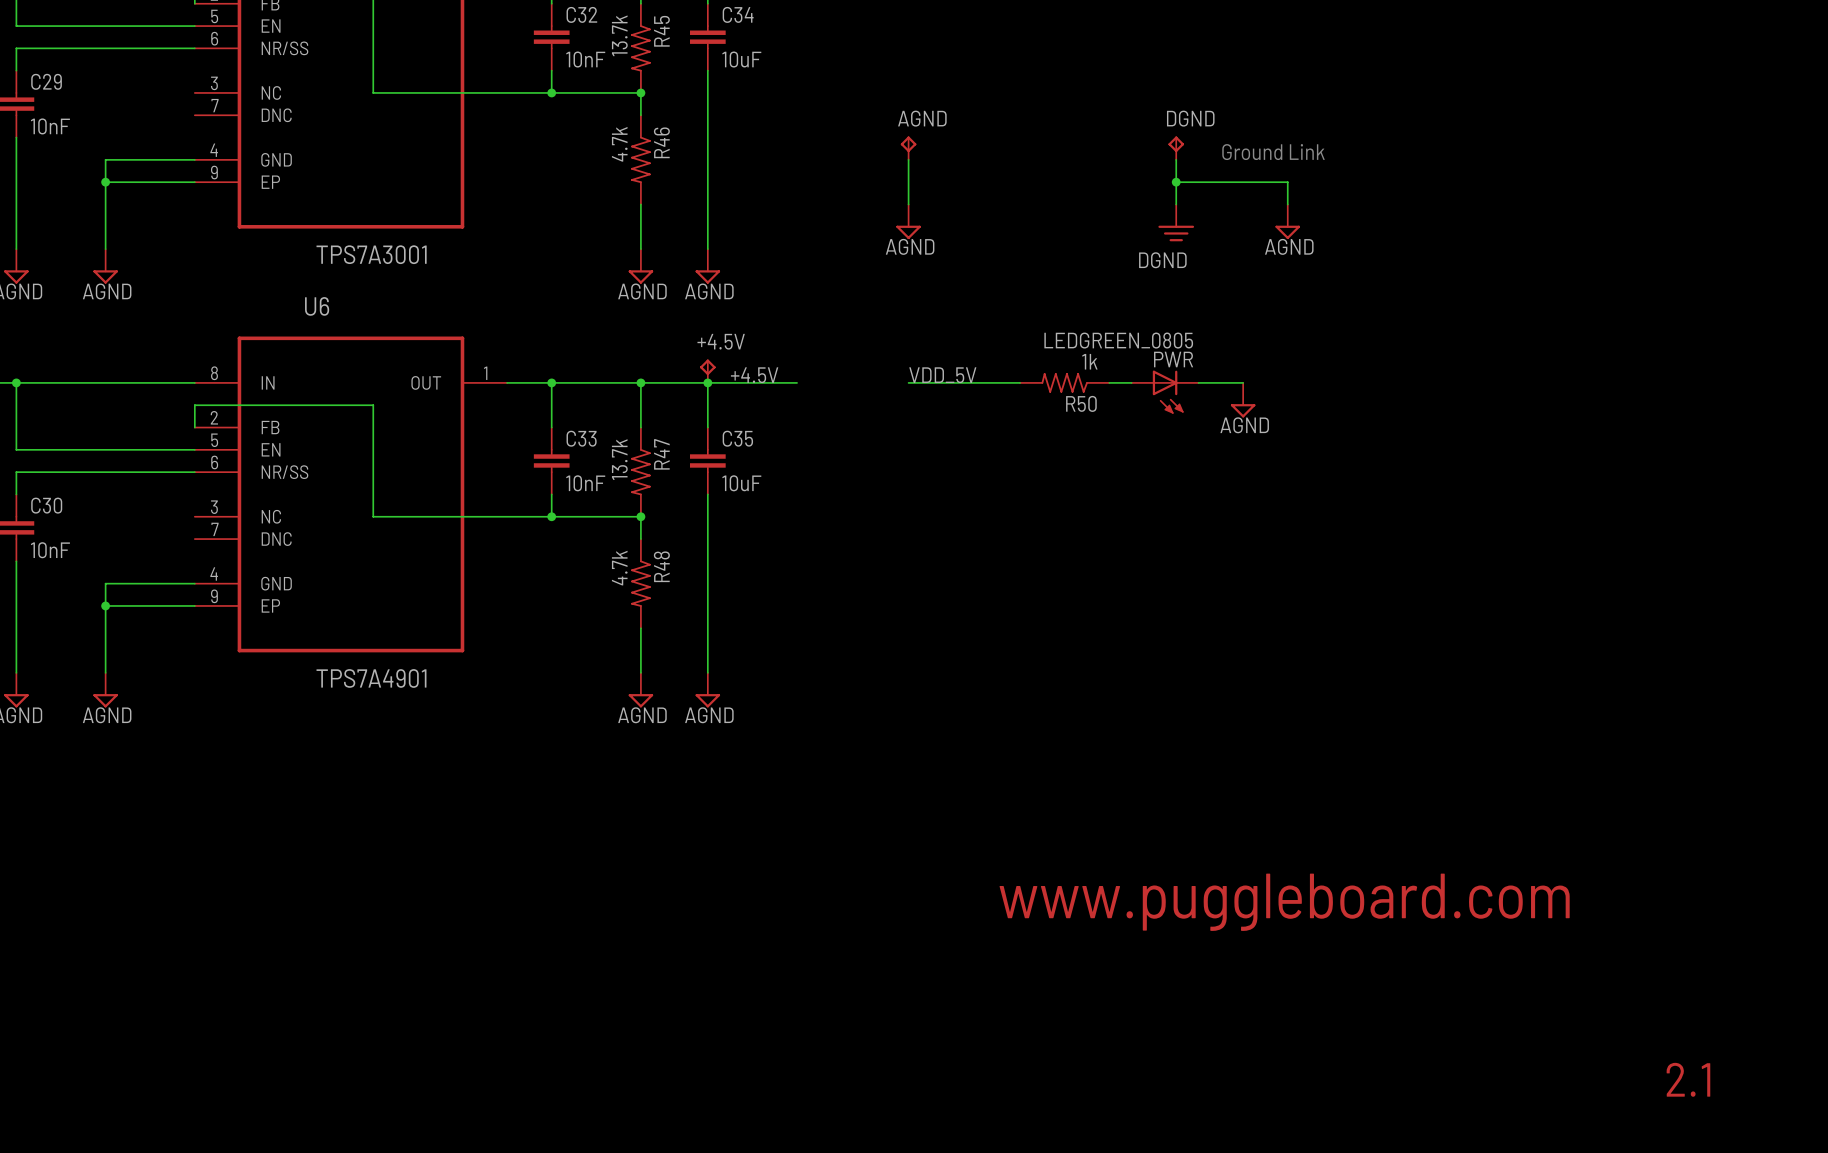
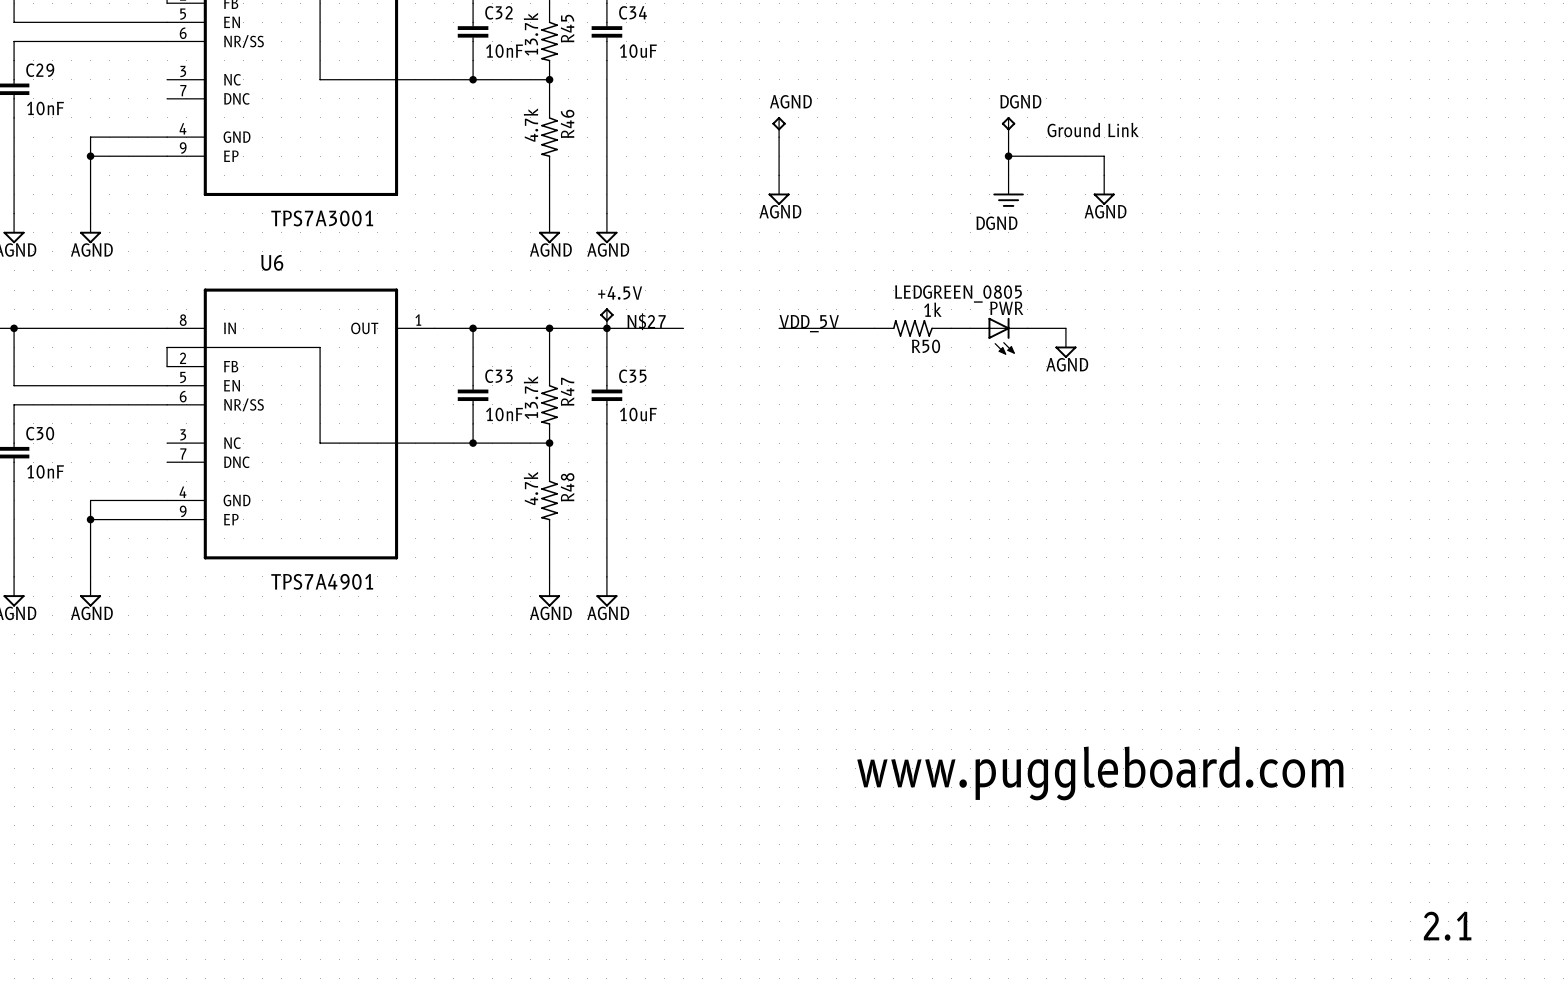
label: +4.5V (754, 375) -> N$27 (646, 321)

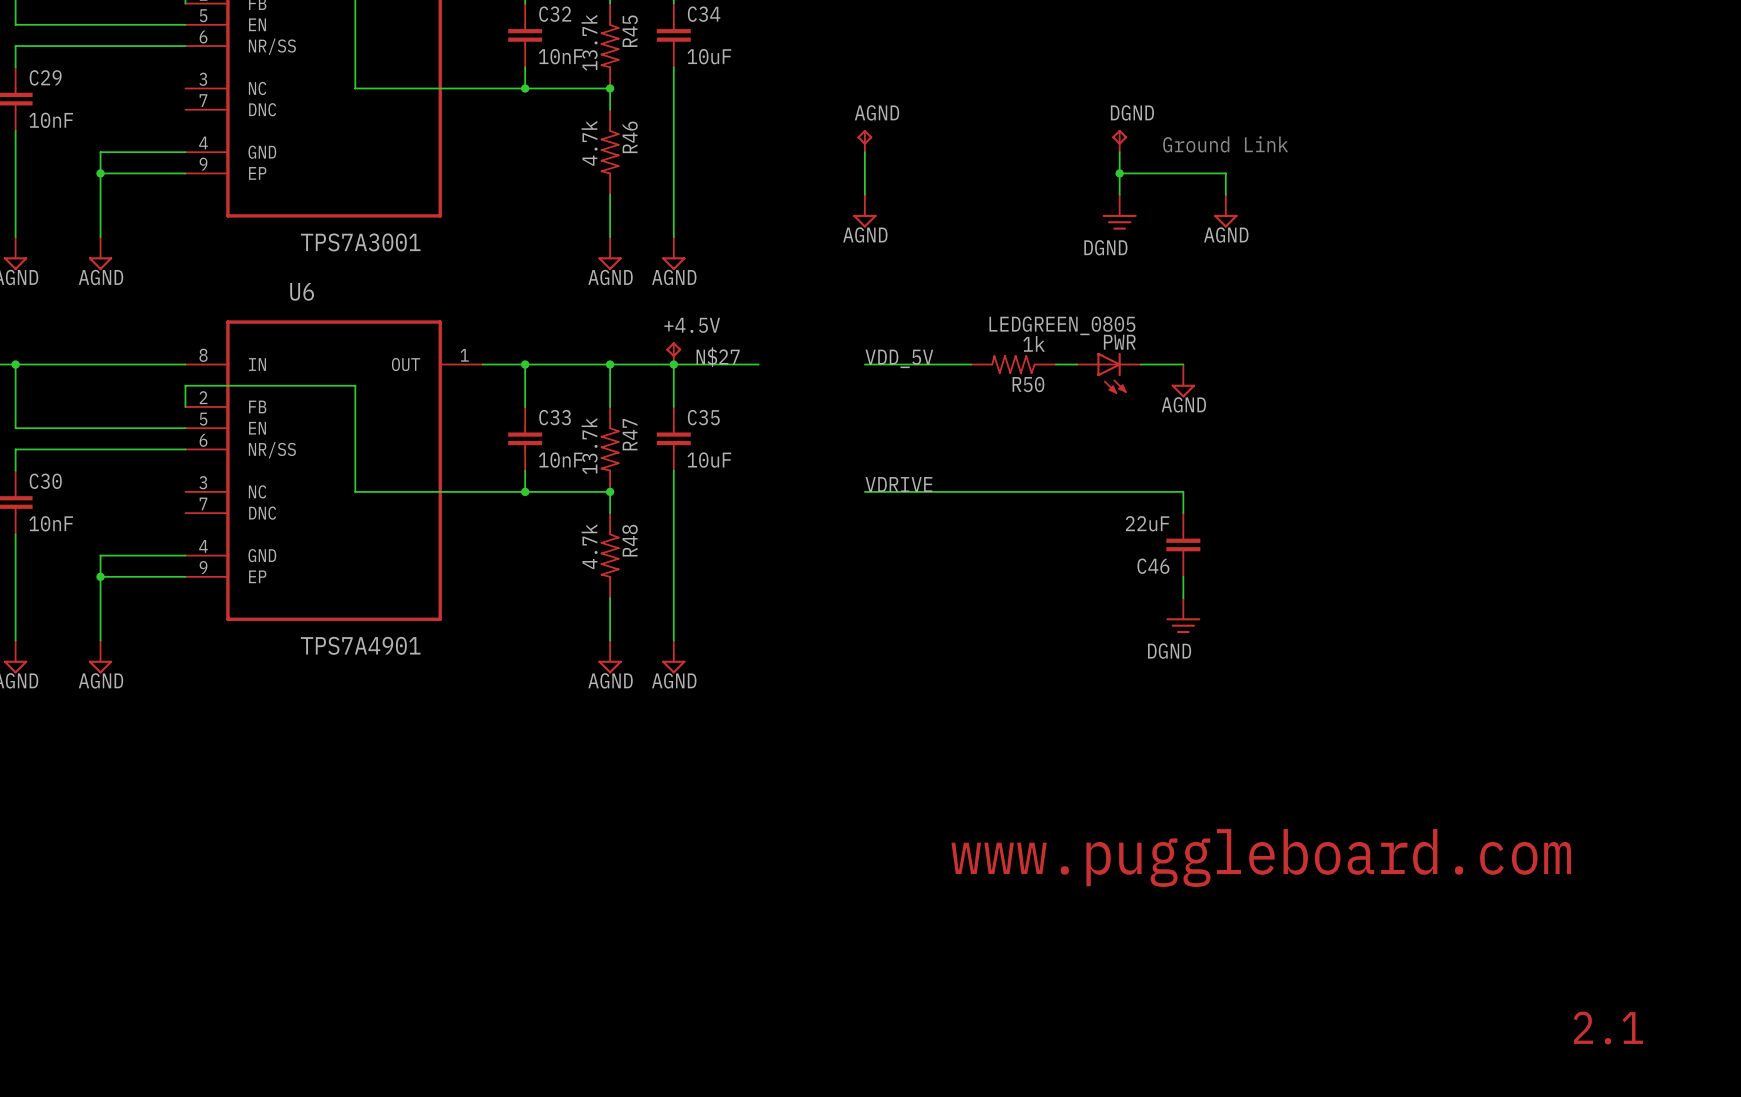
label: none -> VDRIVE (898, 484)
wire: none -> (864, 491) (1183, 491) (1183, 513)
C46: none -> 22uF (1183, 544)
wire: none -> (1183, 576) (1183, 598)
power symbol: none -> DGND (1183, 615)

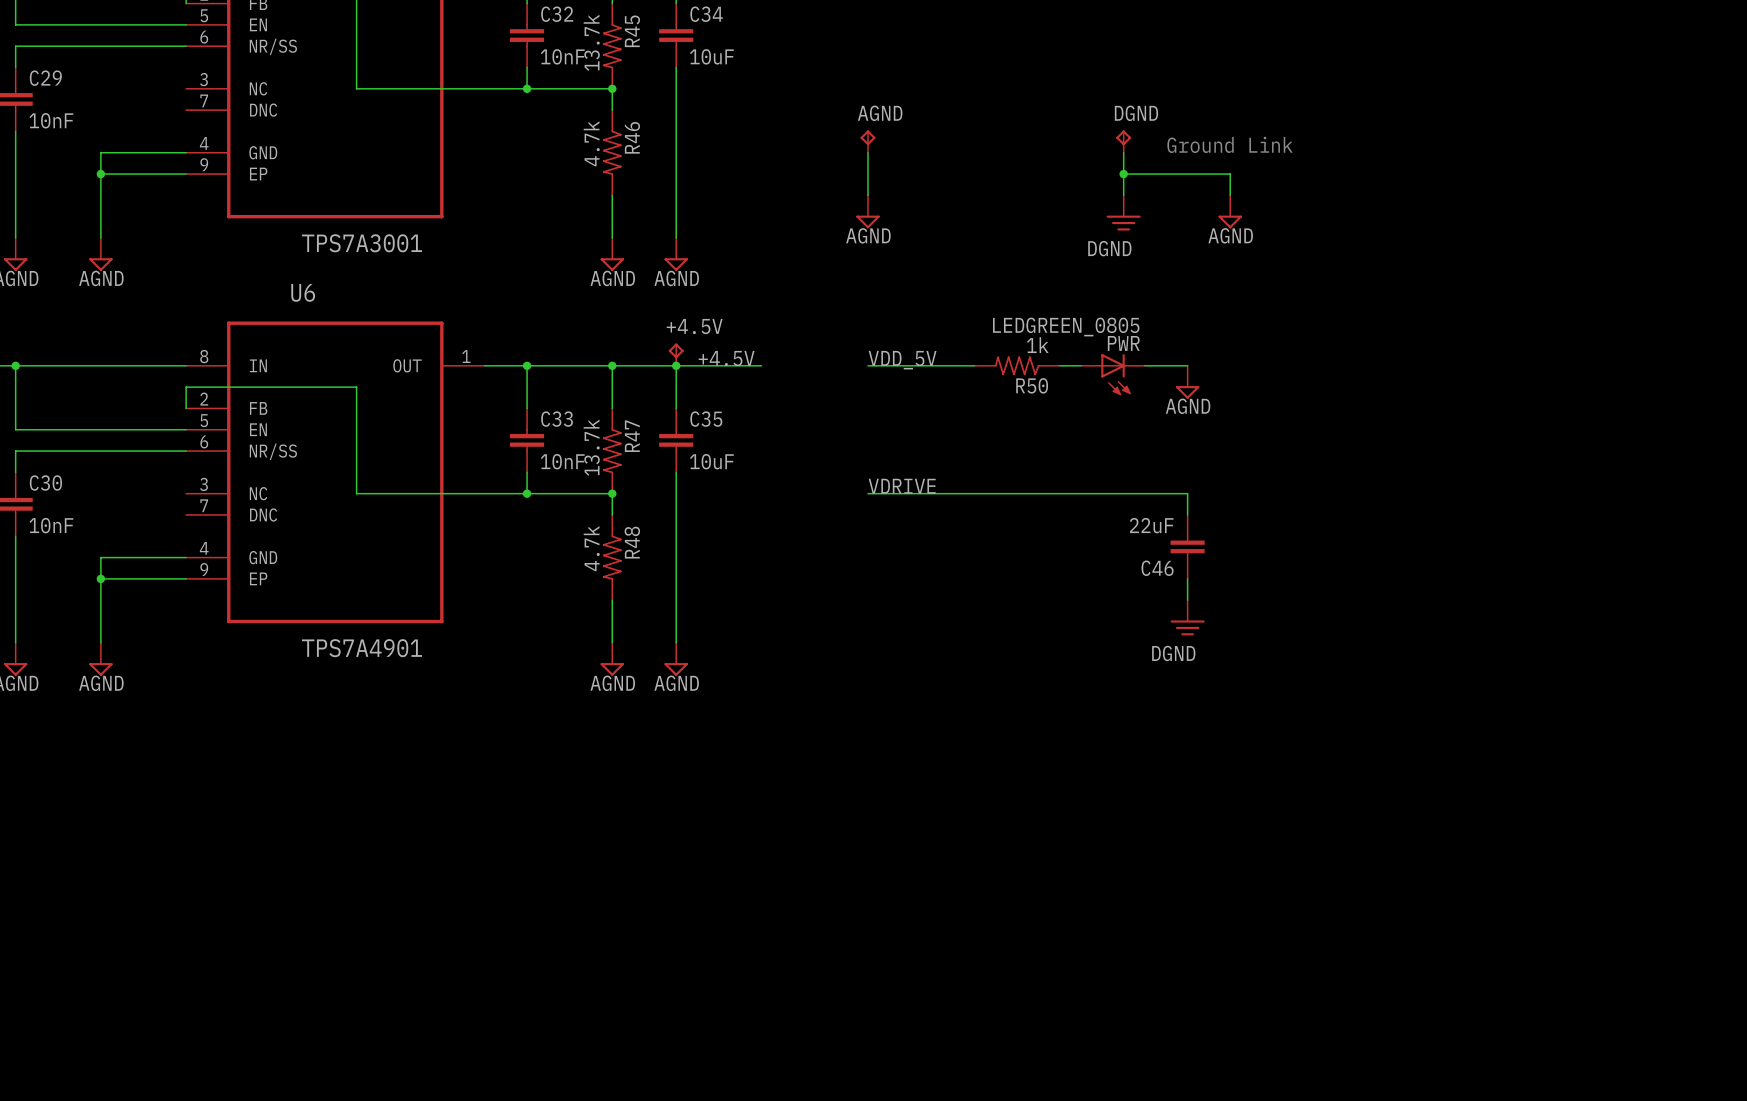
label: N$27 (718, 357) -> +4.5V (726, 358)
text: www.puggleboard.com (1261, 858) -> none
text: 2.1 (1608, 1027) -> none

